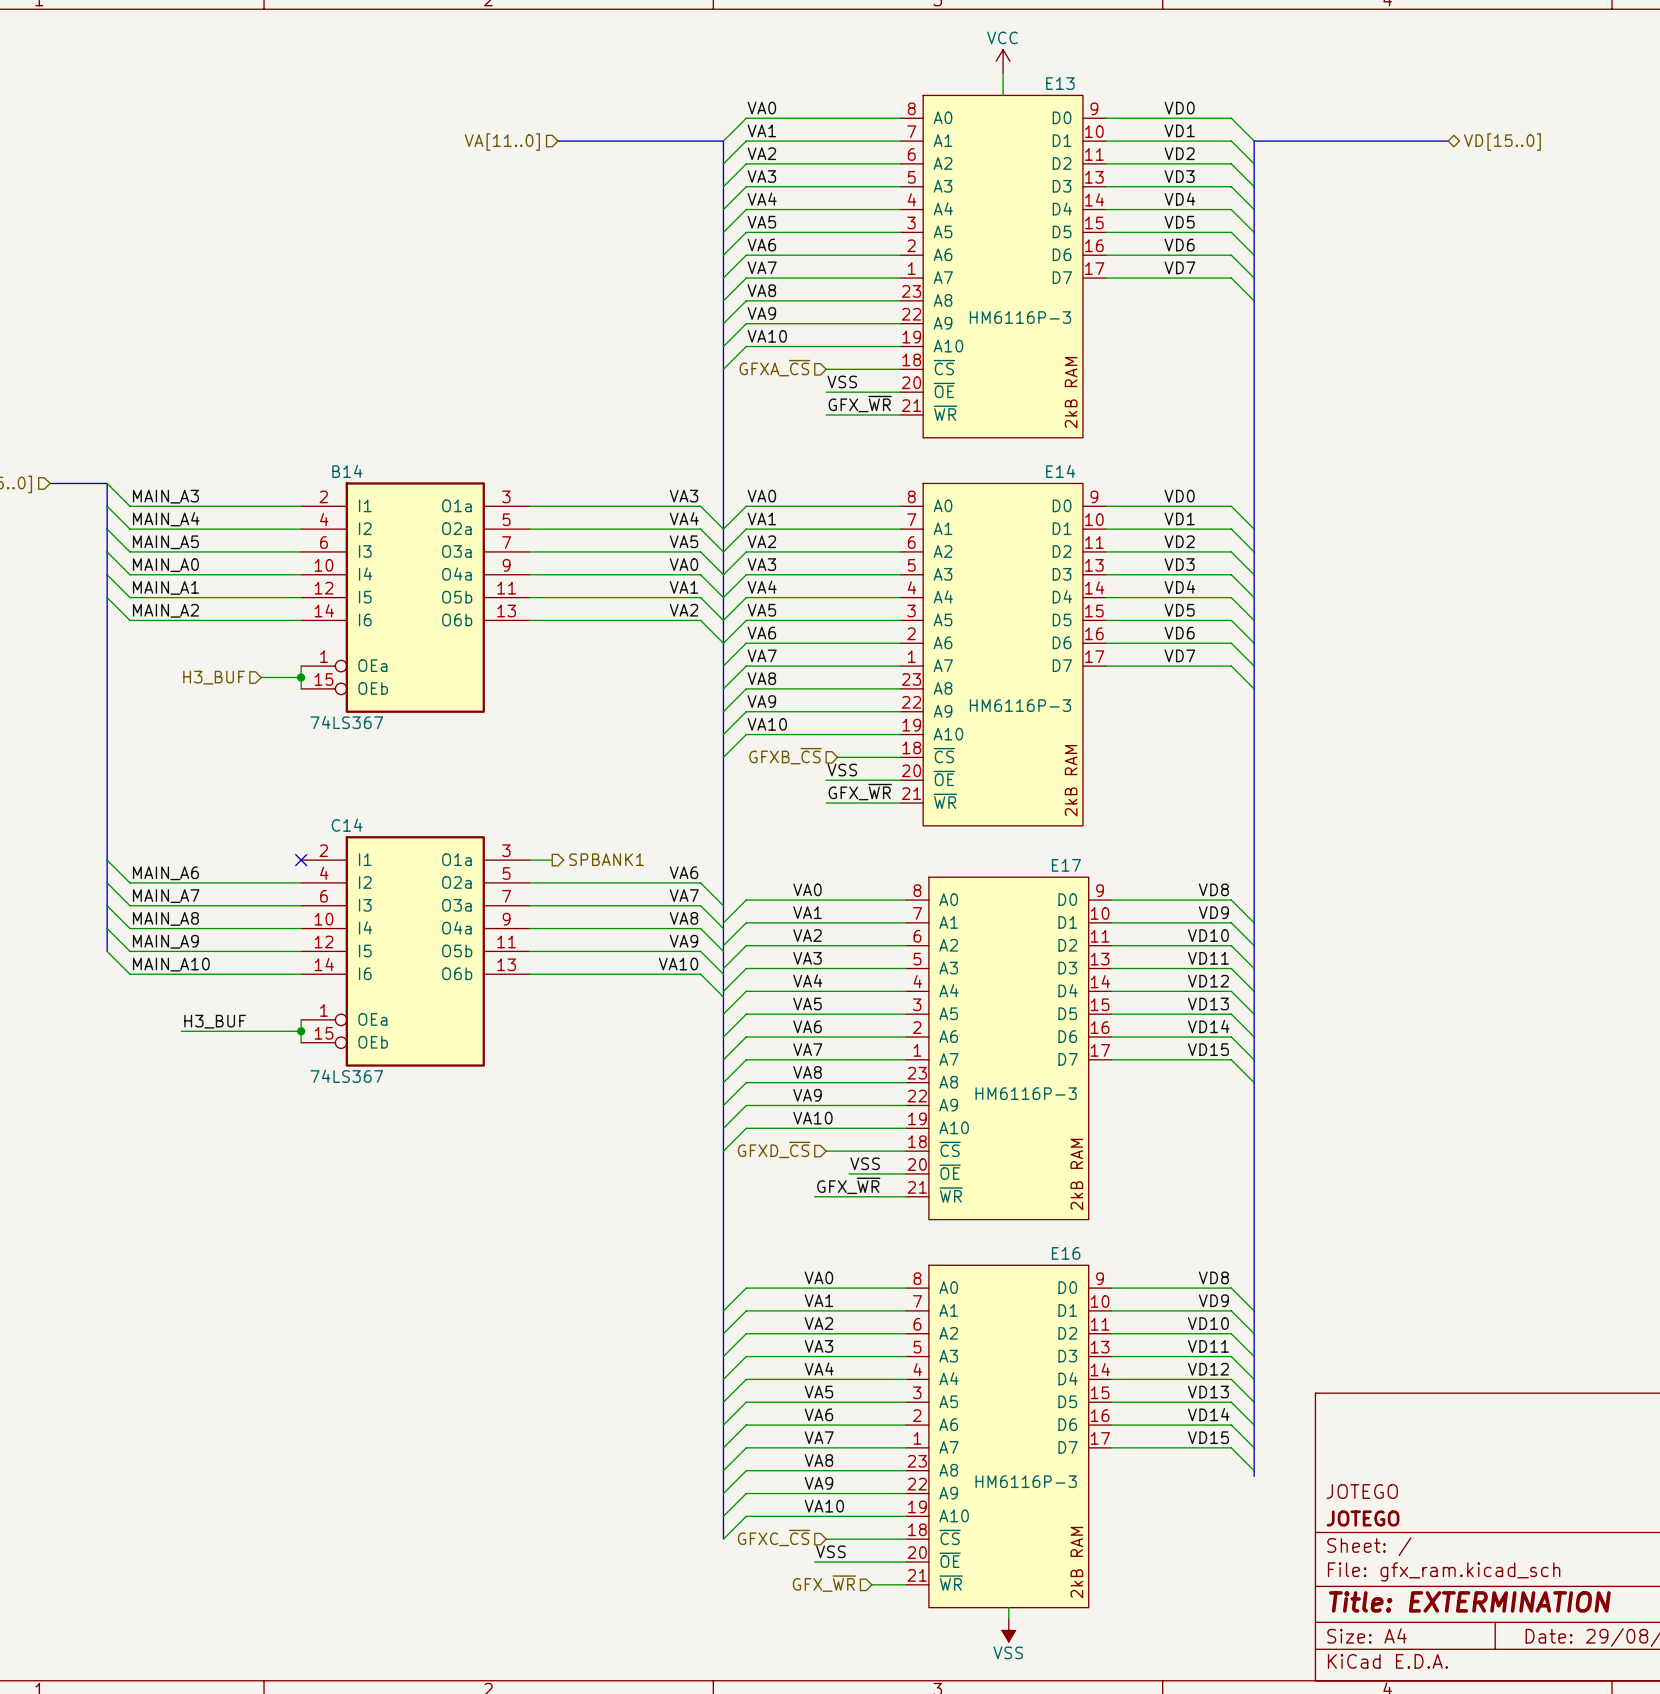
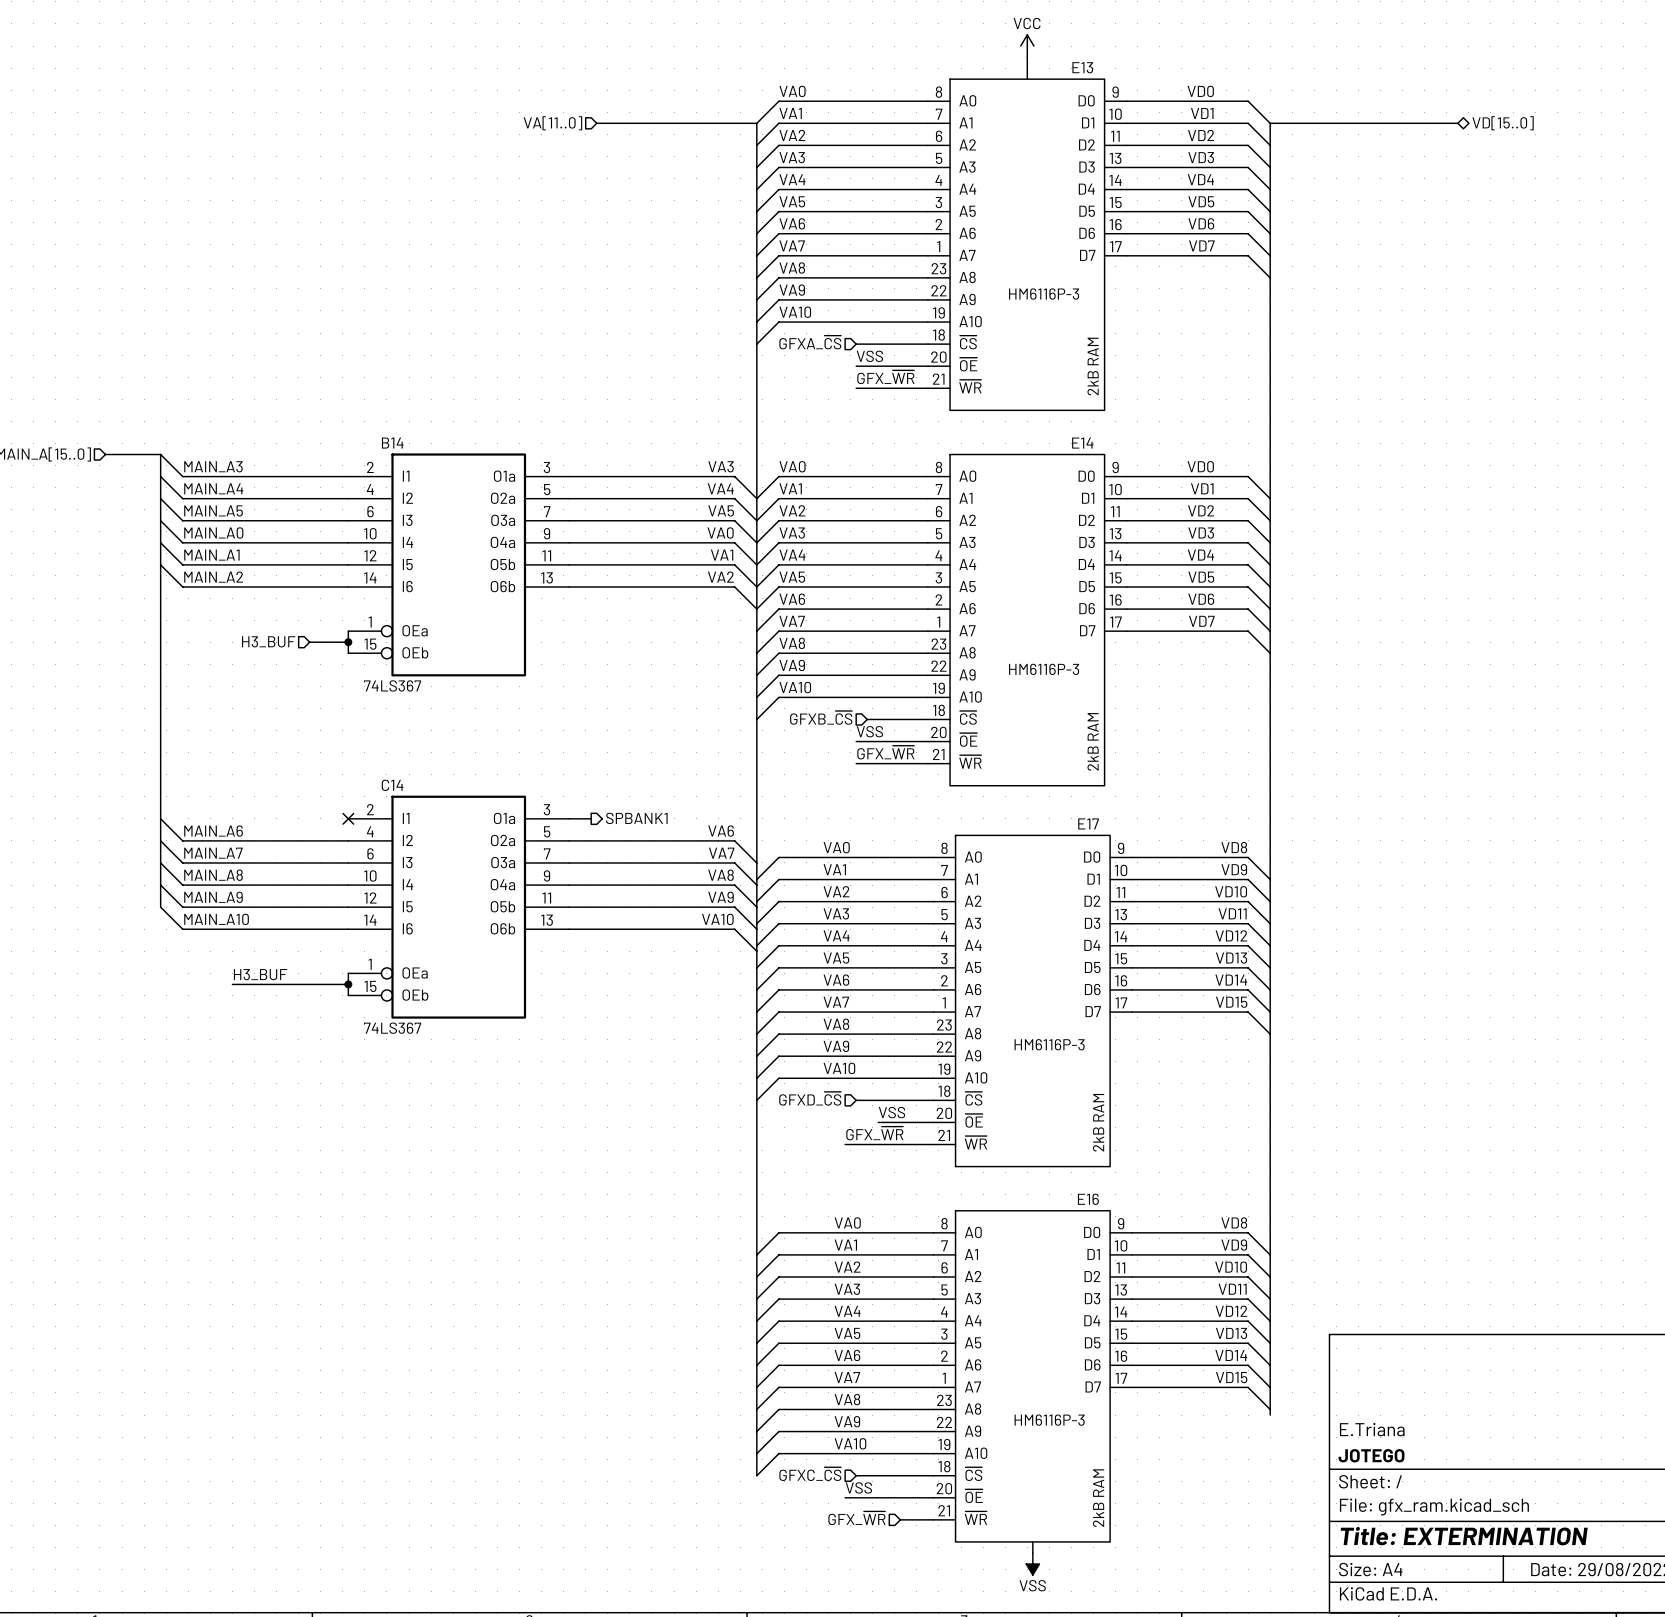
title block: JOTEGO (1362, 1491) -> E.Triana (1372, 1429)

